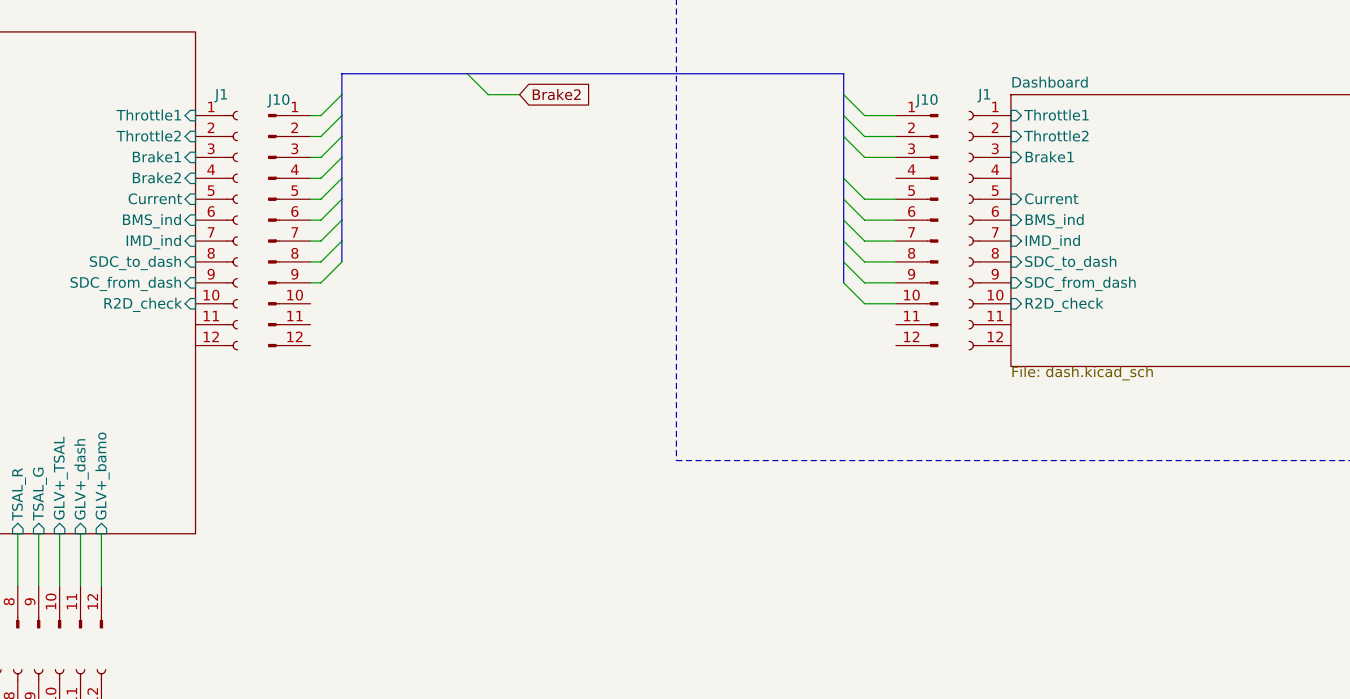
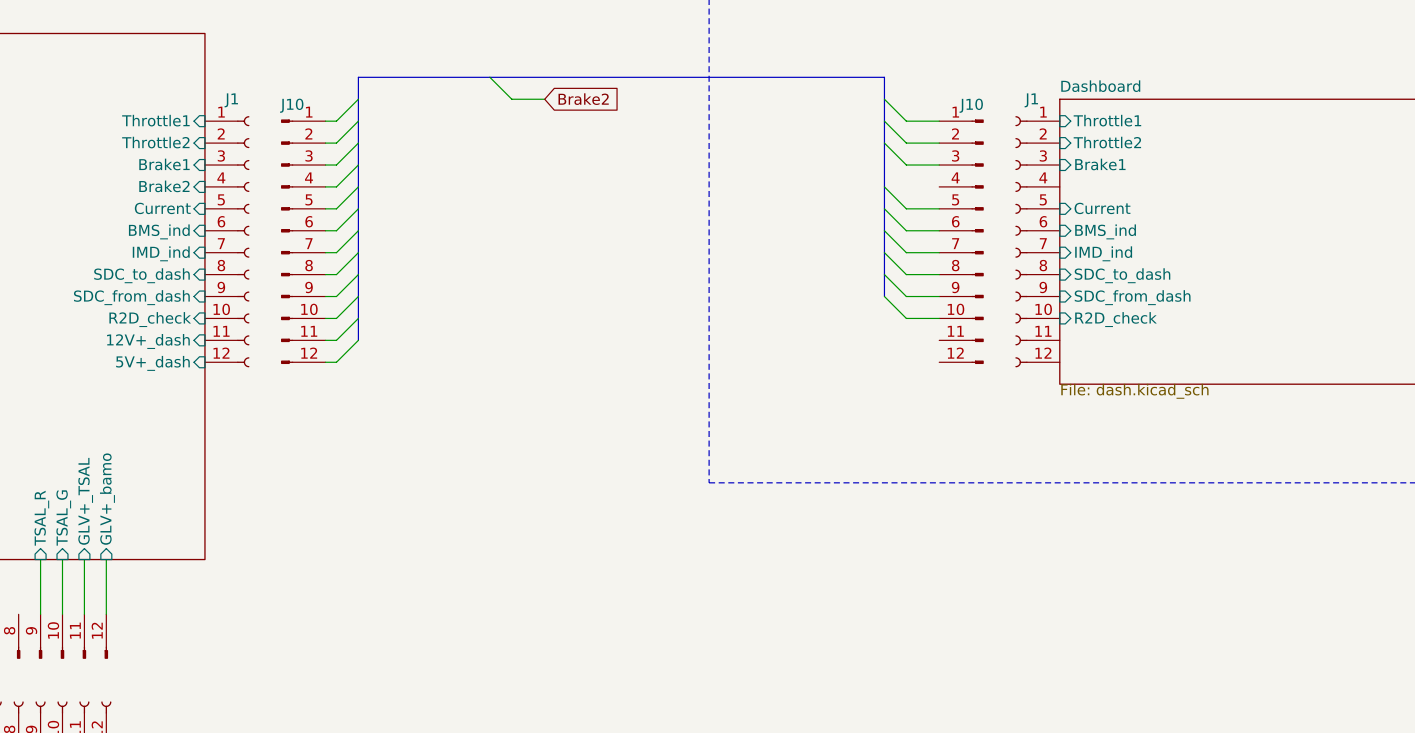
bus: none -> (358, 274) (358, 340)
wire: none -> (358, 296) (336, 318) (325, 318)
wire: none -> (358, 318) (336, 340) (325, 340)
wire: none -> (358, 340) (336, 362) (325, 362)
sheet pin: none -> 12V+_dash (148, 341)
sheet pin: none -> 5V+_dash (152, 363)
sheet pin: GLV+_TSAL (60, 478) -> TSAL_G (63, 517)
sheet pin: GLV+_dash (81, 479) -> GLV+_TSAL (85, 501)
sheet pin: TSAL_R (19, 494) -> none
sheet pin: TSAL_G (39, 494) -> TSAL_R (41, 518)
wire: (17, 533) (17, 586) -> none

